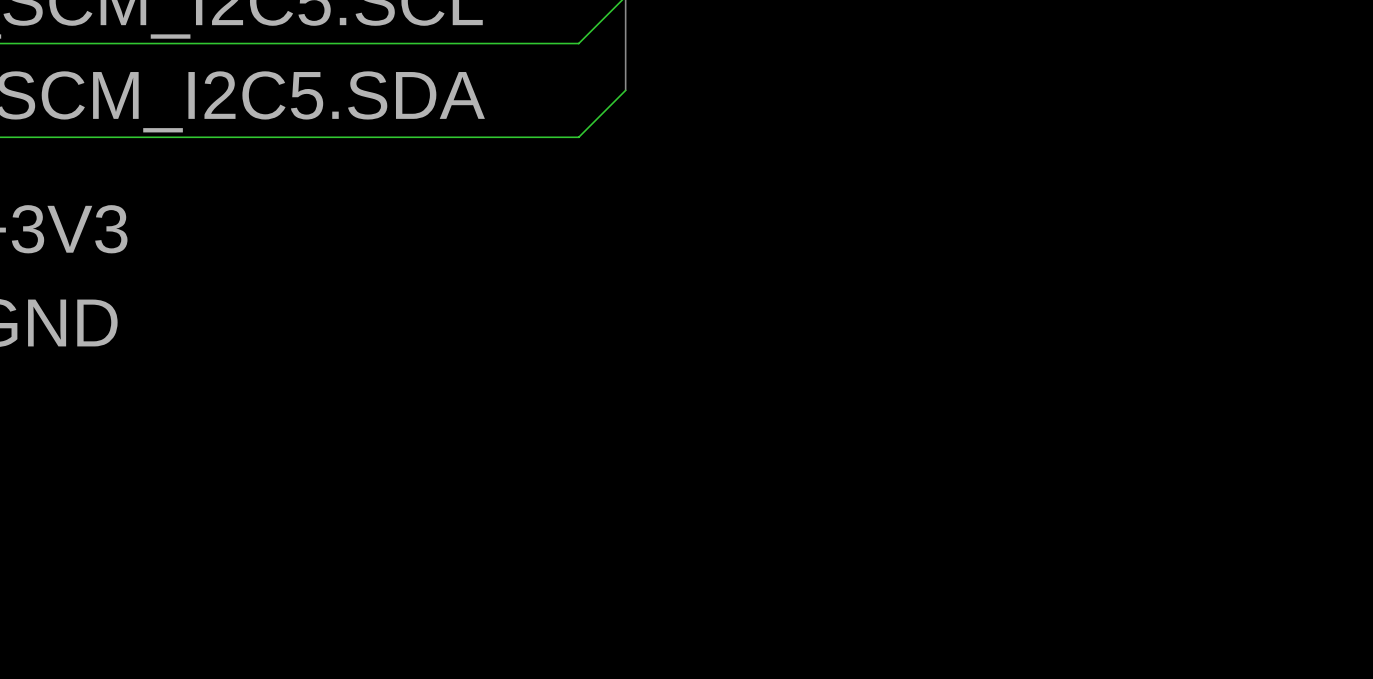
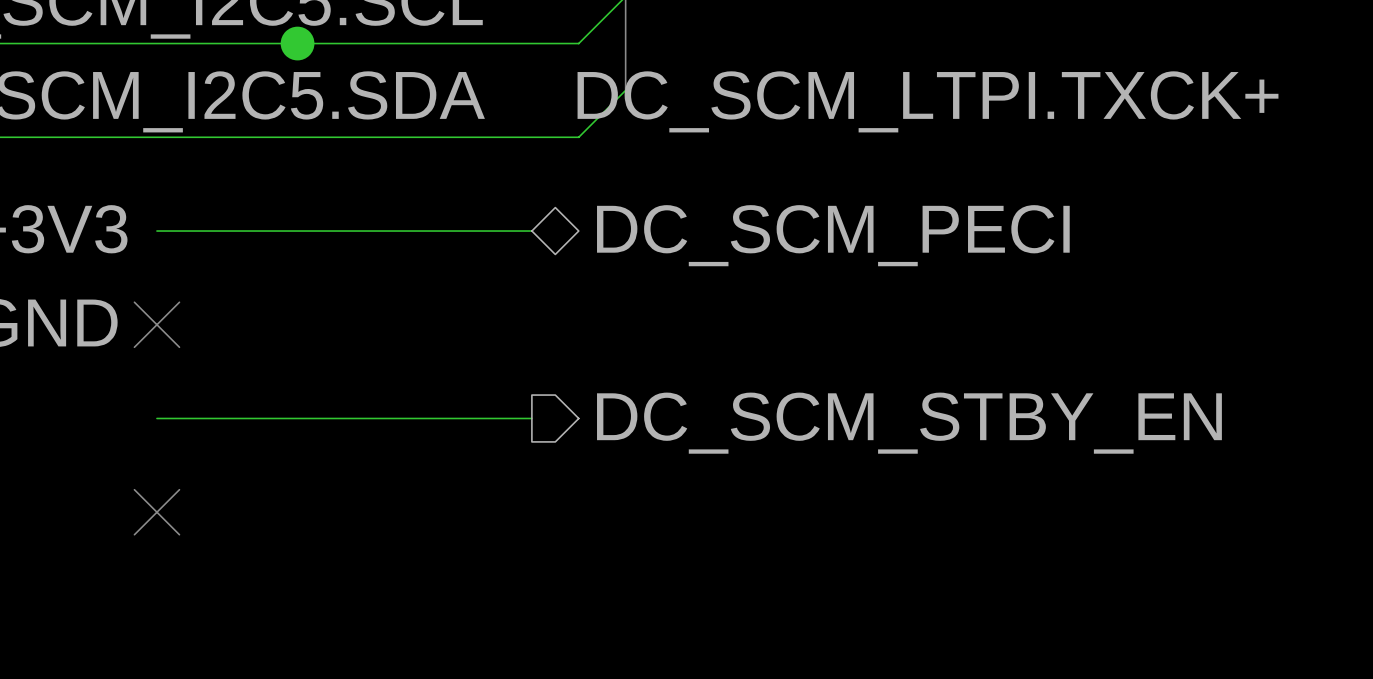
junction: none -> (297, 43)
label: none -> DC_SCM_LTPI.TXCK+ (928, 101)
wire: none -> (156, 231) (531, 231)
hierarchical label: none -> DC_SCM_PECI (833, 235)
no-connect mark: none -> (156, 324)
wire: none -> (156, 418) (531, 418)
hierarchical label: none -> DC_SCM_STBY_EN (909, 423)
no-connect mark: none -> (156, 512)

